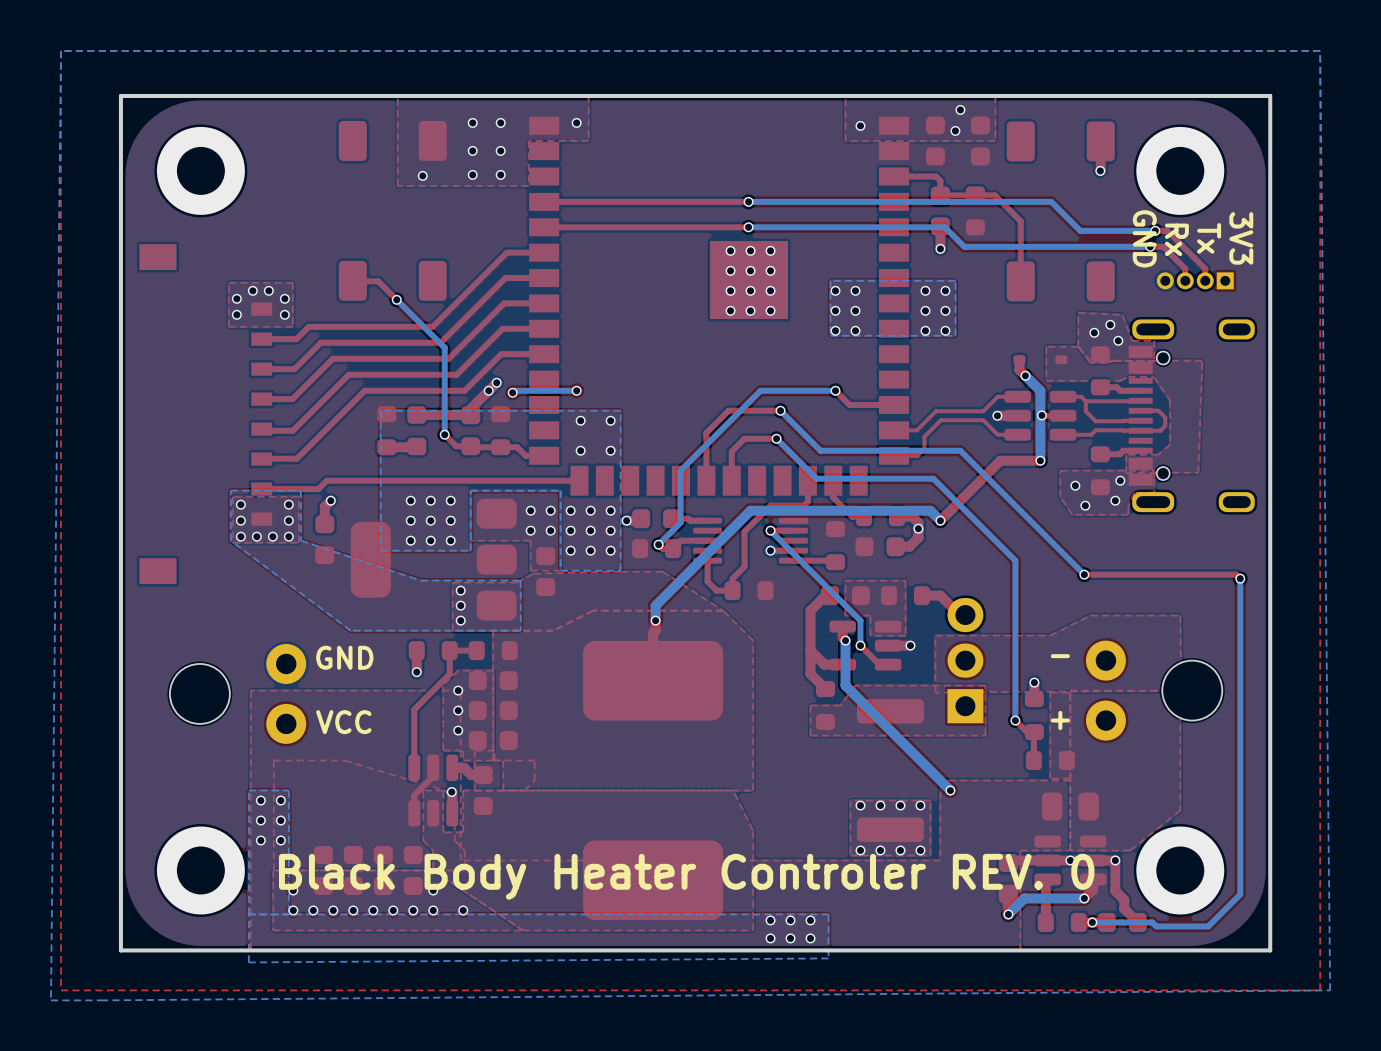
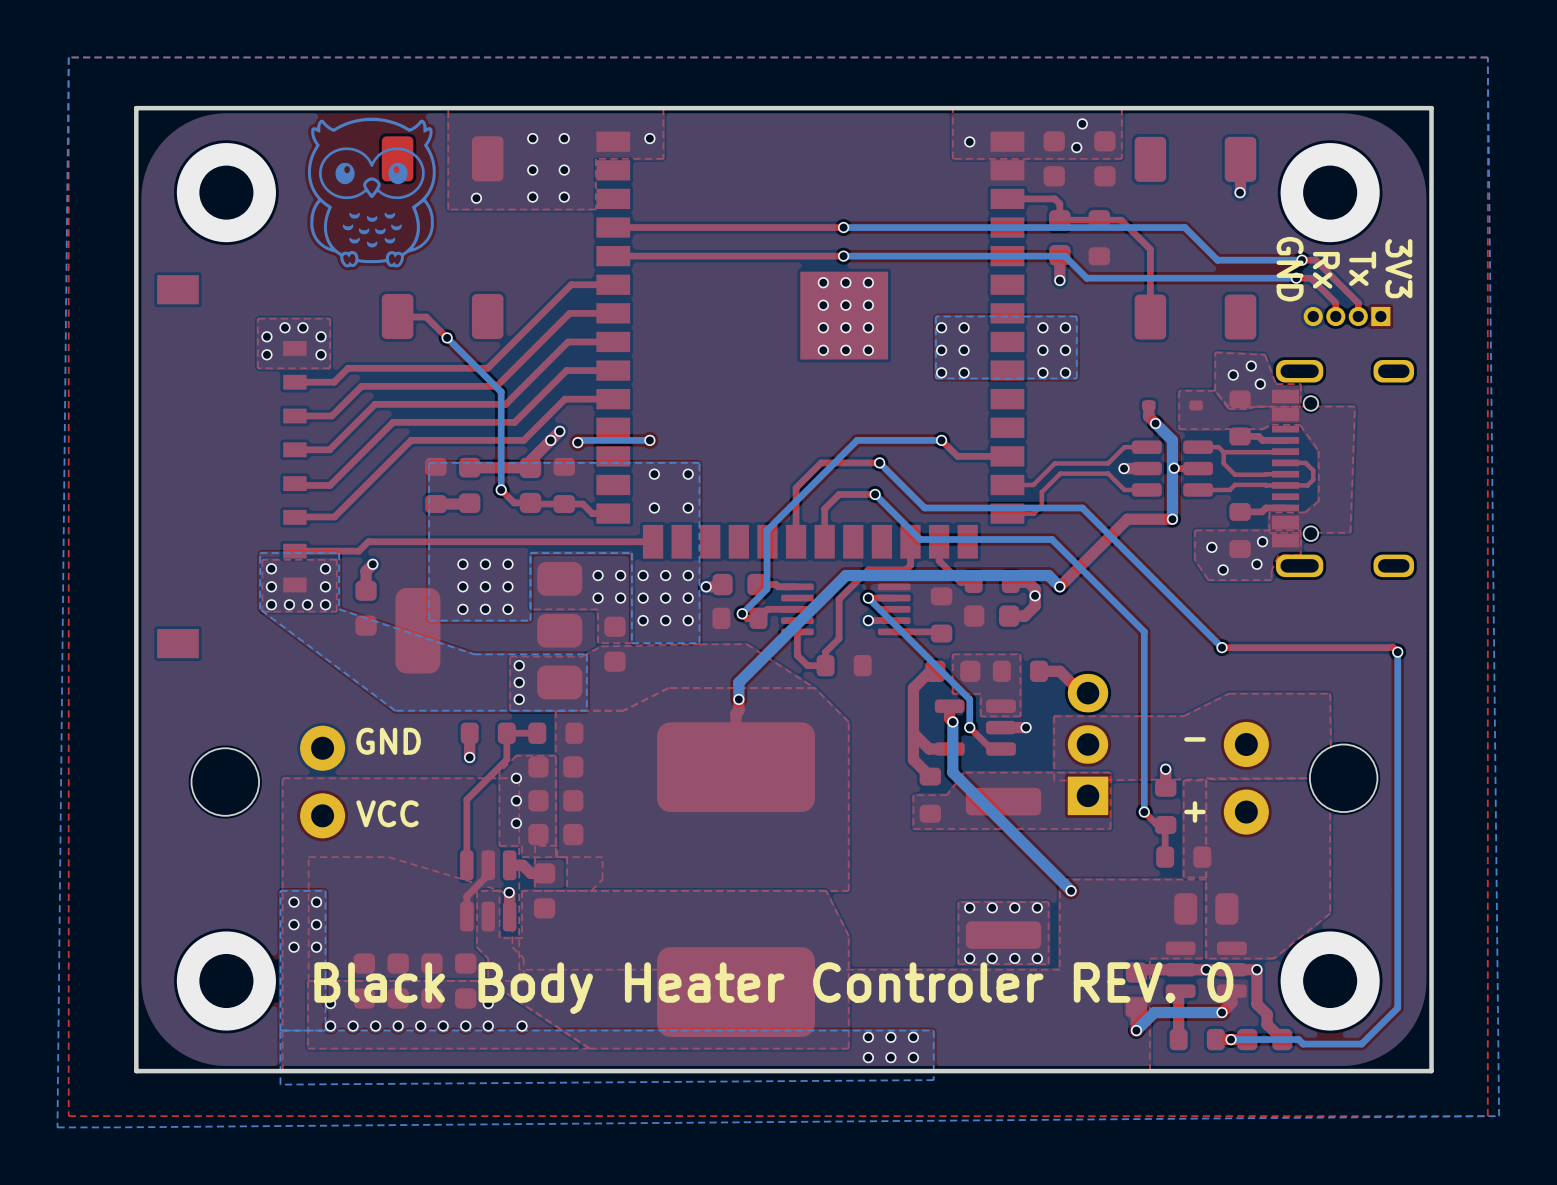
drawing: none -> [307, 117, 436, 268]

